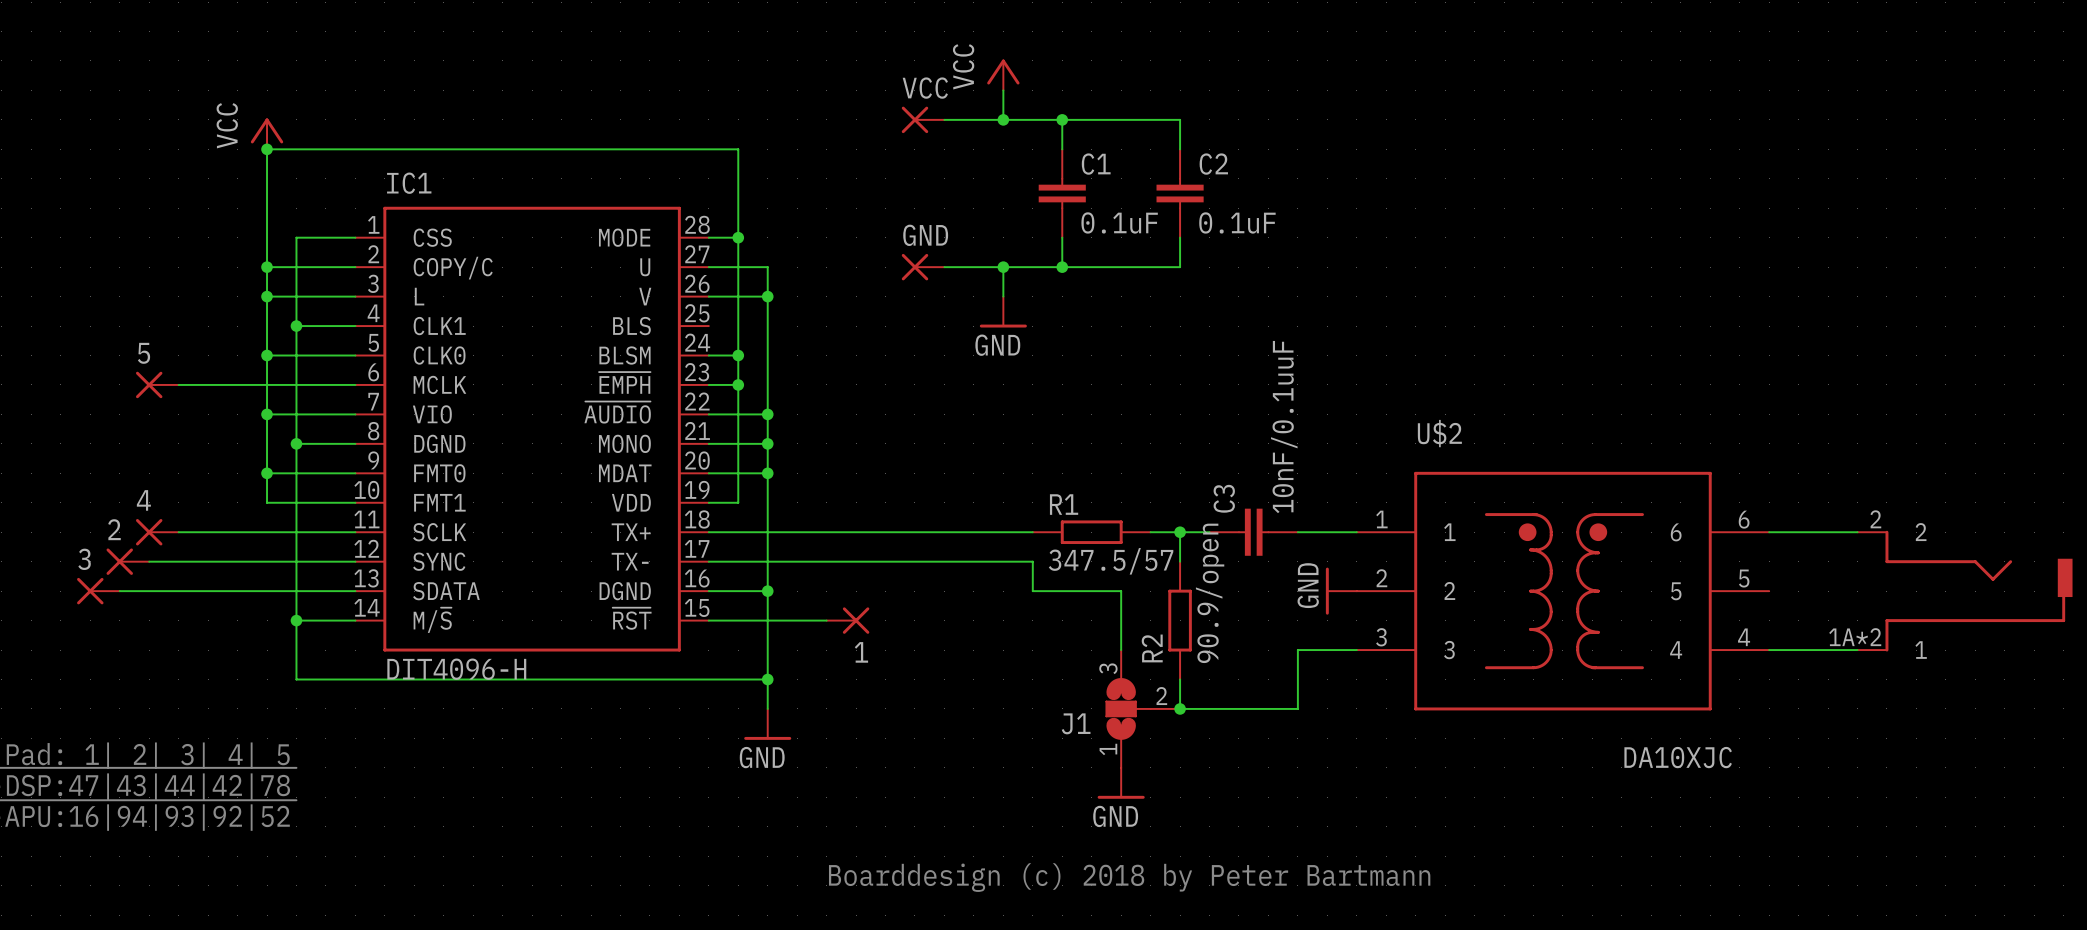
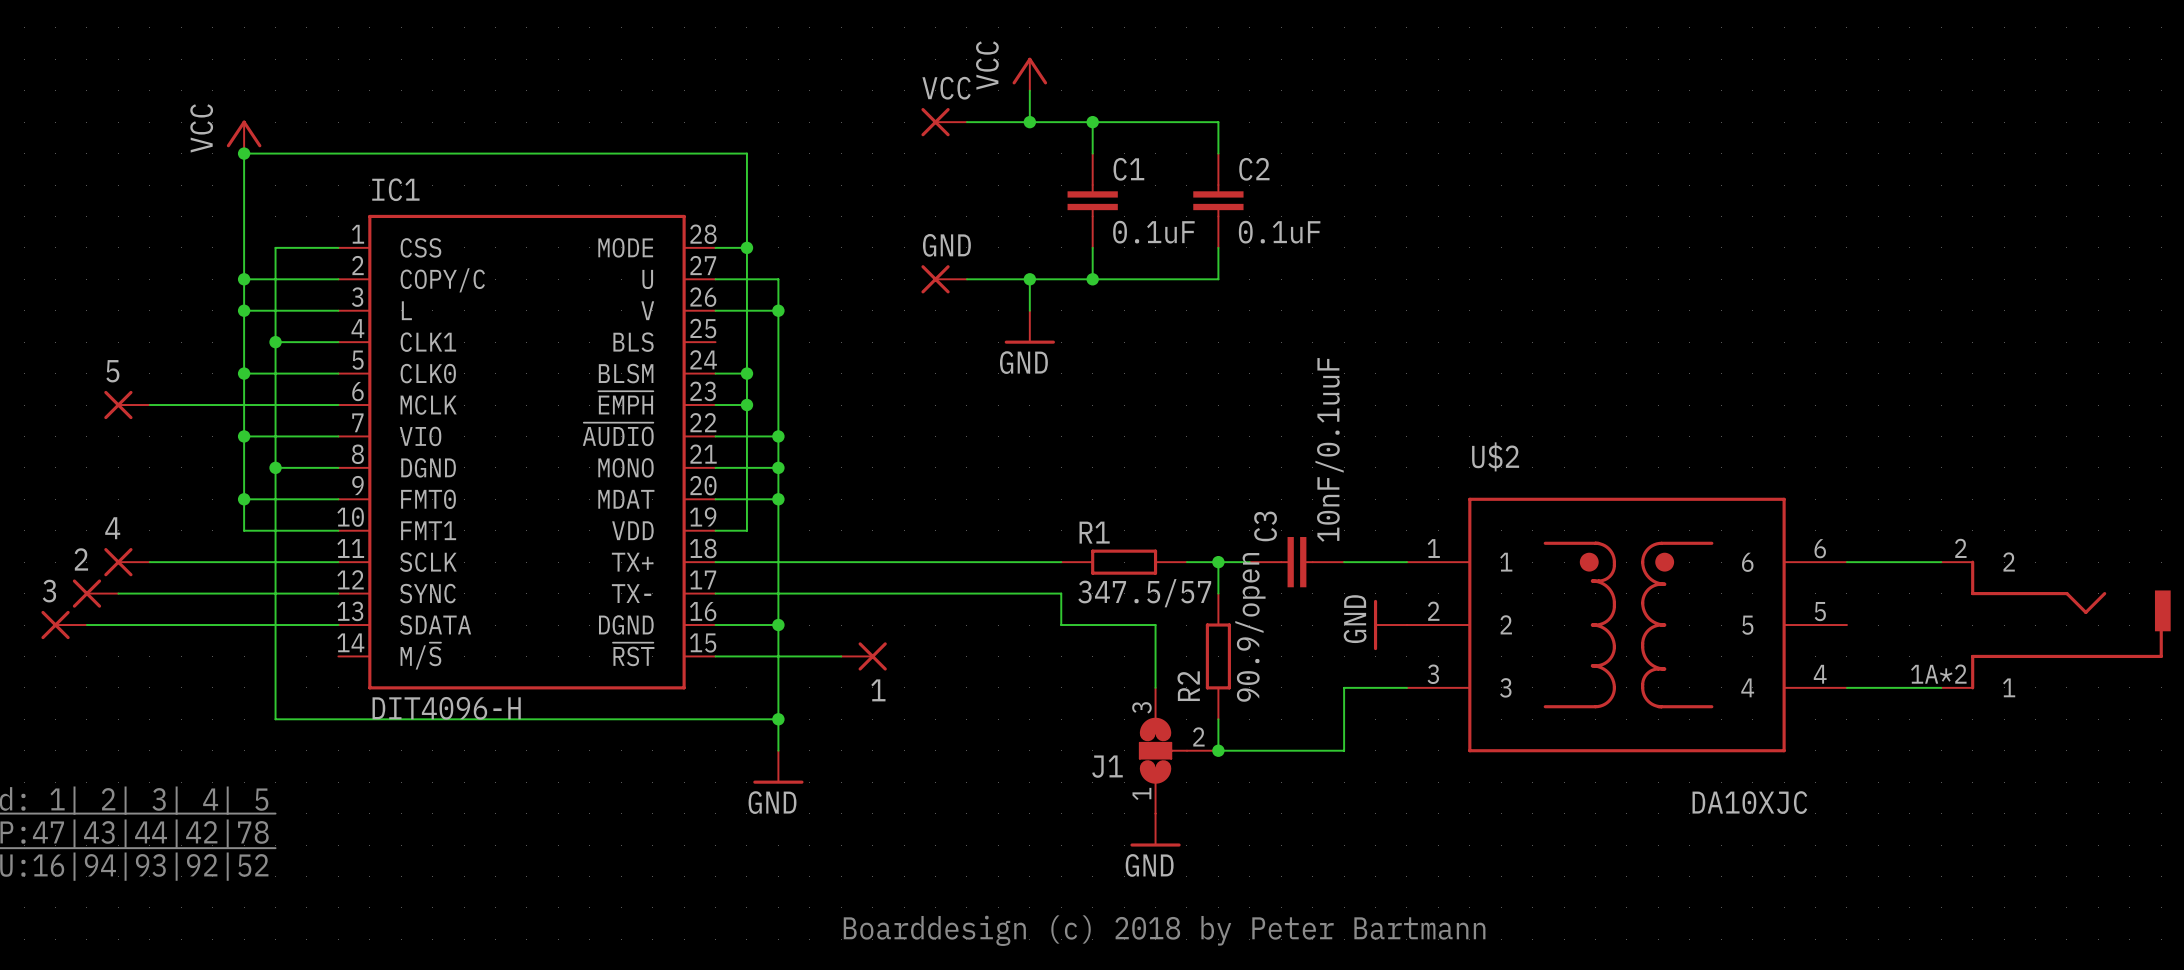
wire: (296, 620) (355, 620) -> none
junction: (296, 620) -> none

